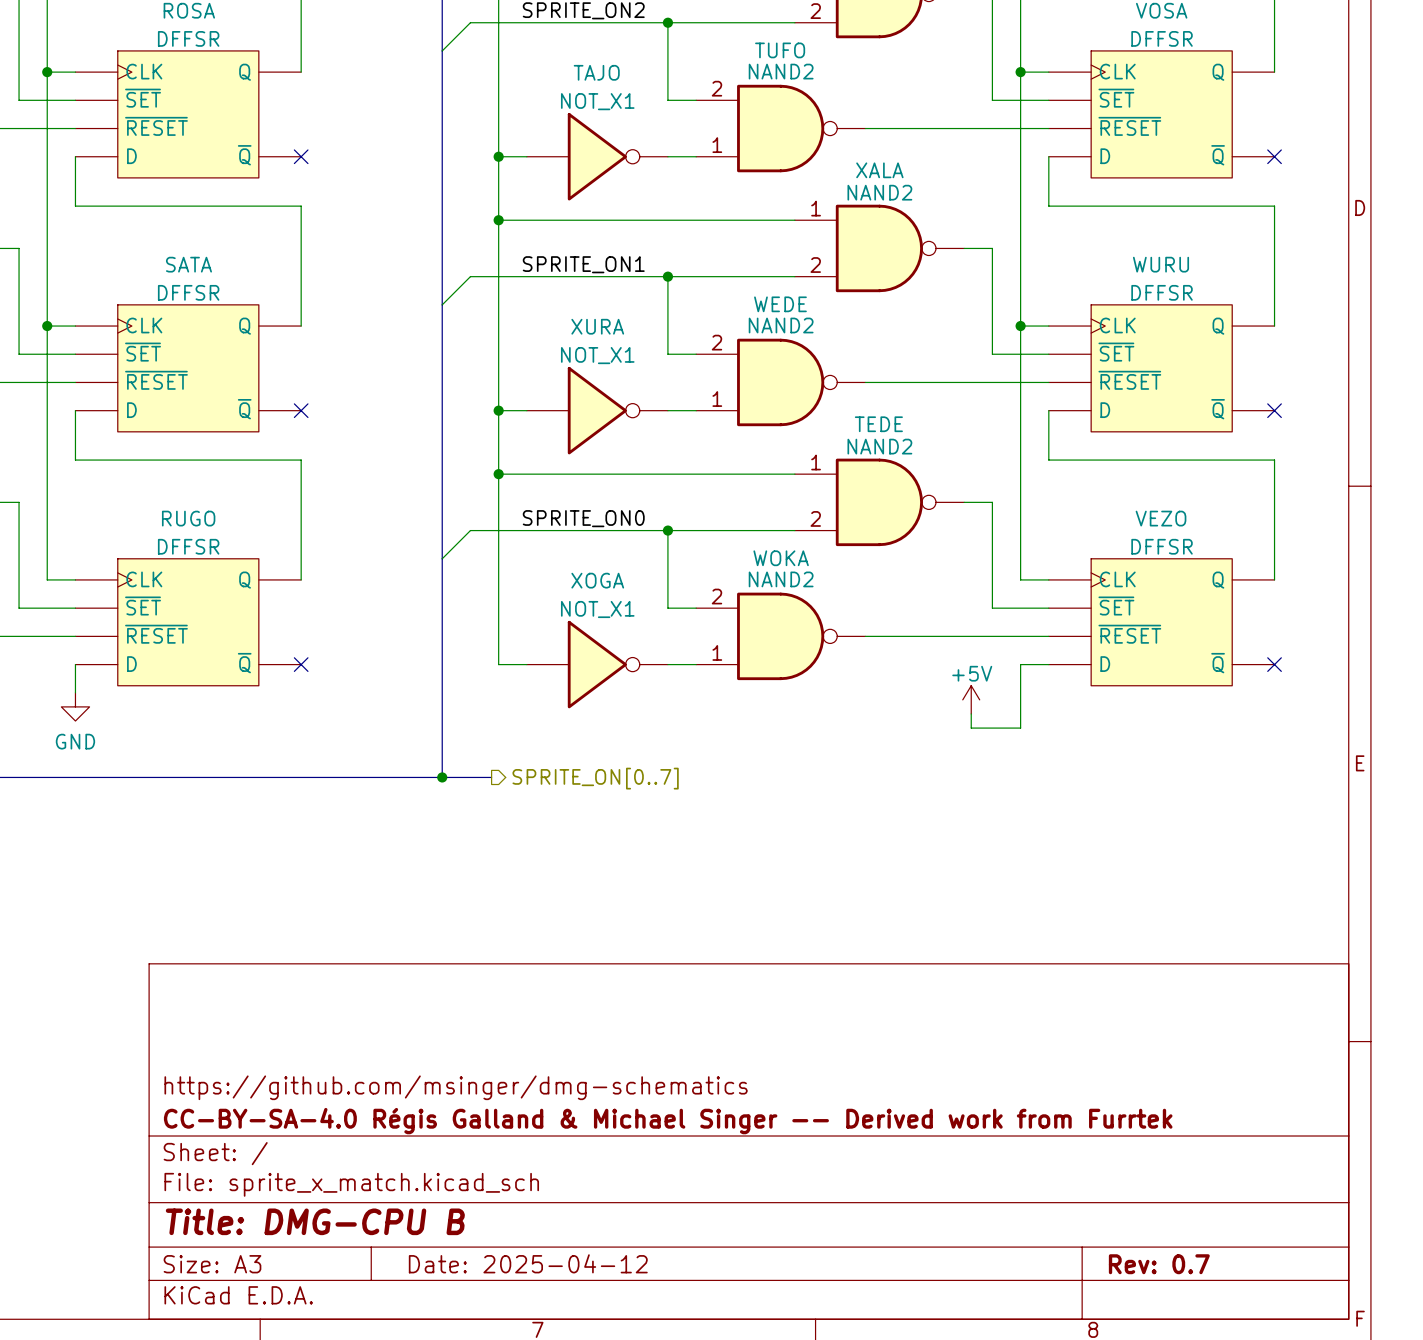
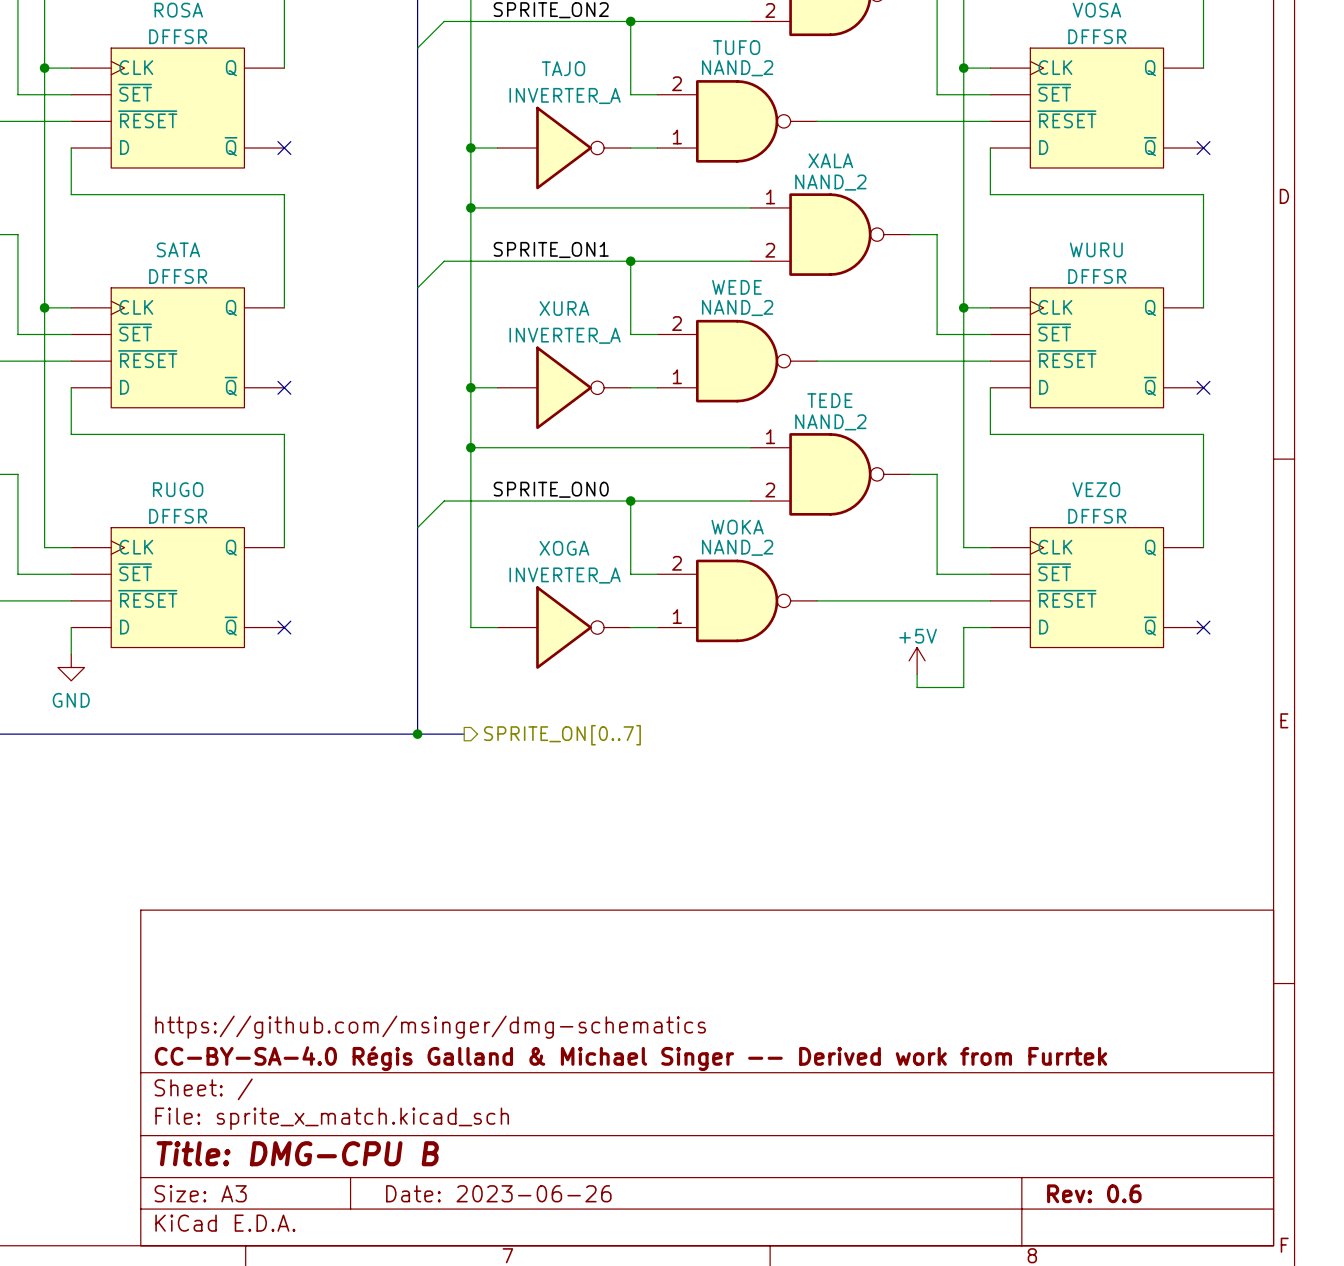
TUFO value: NAND2 (781, 71) -> NAND_2 (737, 68)
TAJO value: NOT_X1 (597, 101) -> INVERTER_A (565, 95)
XALA value: NAND2 (879, 192) -> NAND_2 (830, 182)
WEDE value: NAND2 (781, 325) -> NAND_2 (737, 308)
XURA value: NOT_X1 (597, 355) -> INVERTER_A (565, 335)
TEDE value: NAND2 (879, 446) -> NAND_2 (830, 422)
WOKA value: NAND2 (781, 579) -> NAND_2 (737, 547)
XOGA value: NOT_X1 (597, 609) -> INVERTER_A (565, 575)
title block: Date: 2025-04-12 (528, 1263) -> Date: 2023-06-26 (498, 1193)
title block: Rev: 0.7 (1159, 1264) -> Rev: 0.6 (1094, 1193)

